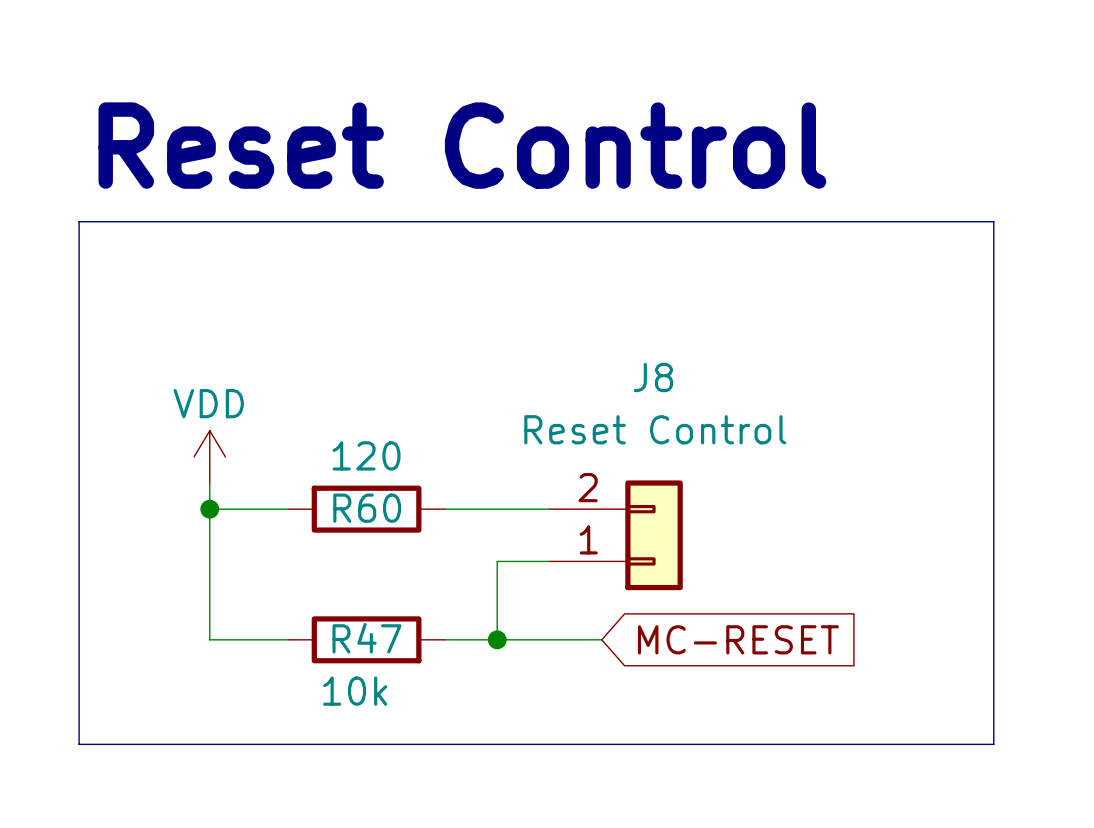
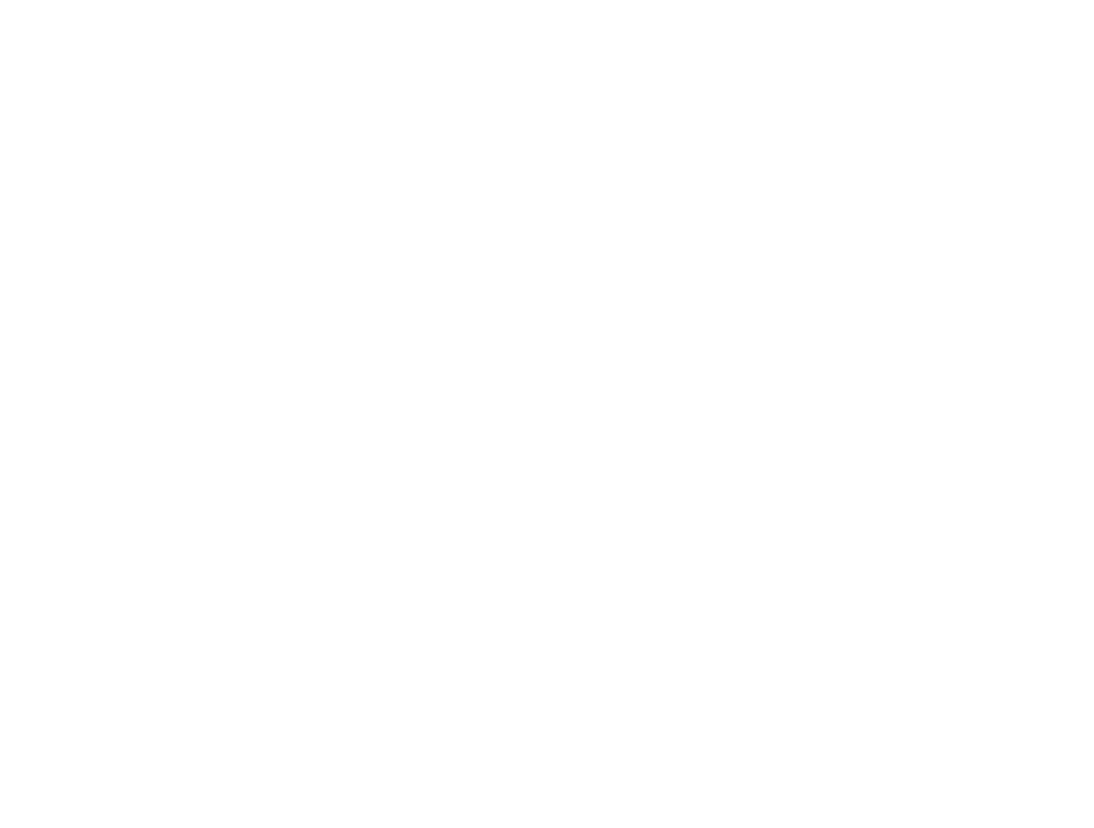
text: Reset Control (462, 145) -> none
line: (79, 221) (993, 221) (993, 744) (79, 744) (79, 221) -> none
power symbol: VDD (209, 456) -> none
wire: (209, 483) (209, 639) (288, 639) -> none
wire: (209, 509) (288, 509) -> none
junction: (209, 509) -> none
R60: 120 (366, 509) -> none
wire: (444, 509) (549, 509) -> none
J8: Reset Control (616, 535) -> none
wire: (549, 561) (497, 561) (497, 639) -> none
R47: 10k (366, 639) -> none
wire: (444, 639) (601, 639) -> none
junction: (497, 639) -> none
global label: MC-RESET (738, 639) -> none

